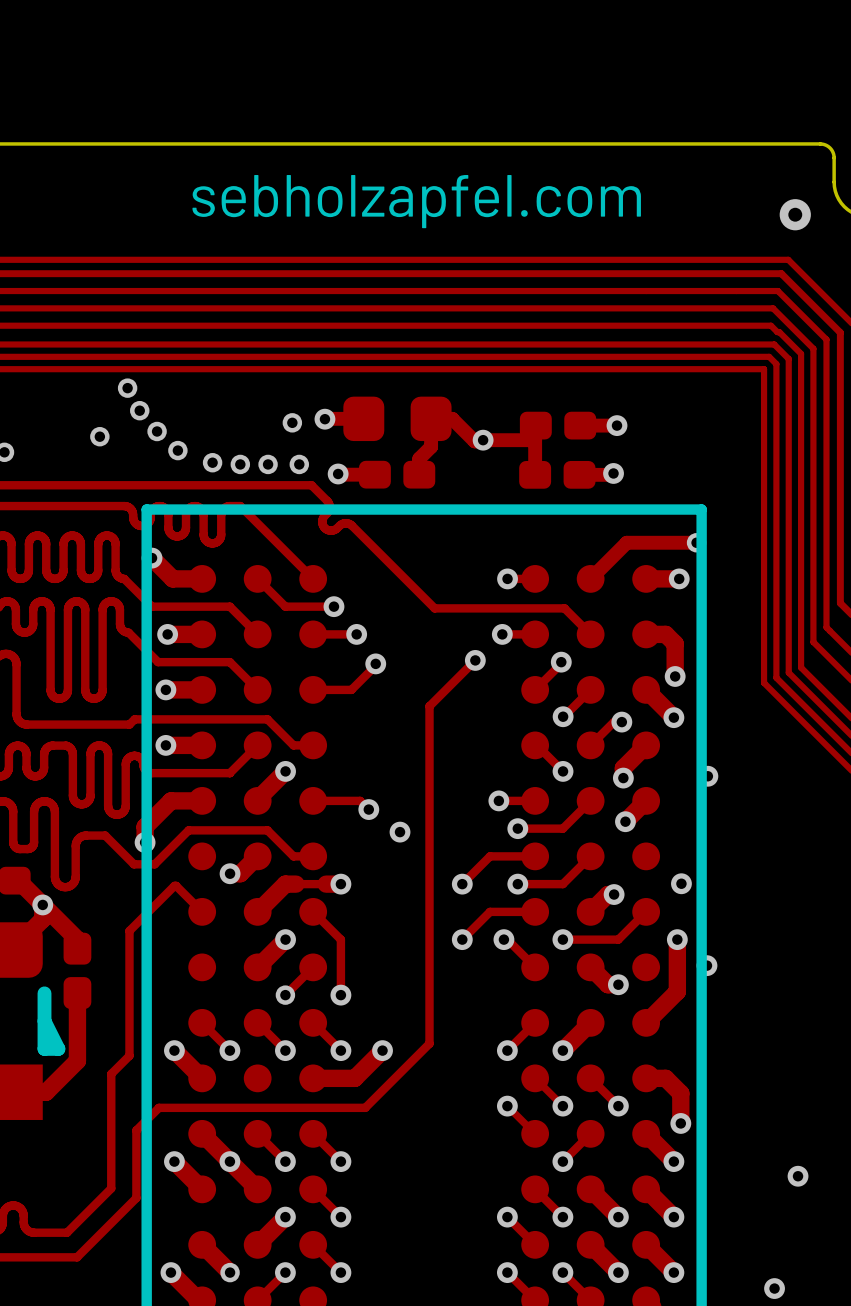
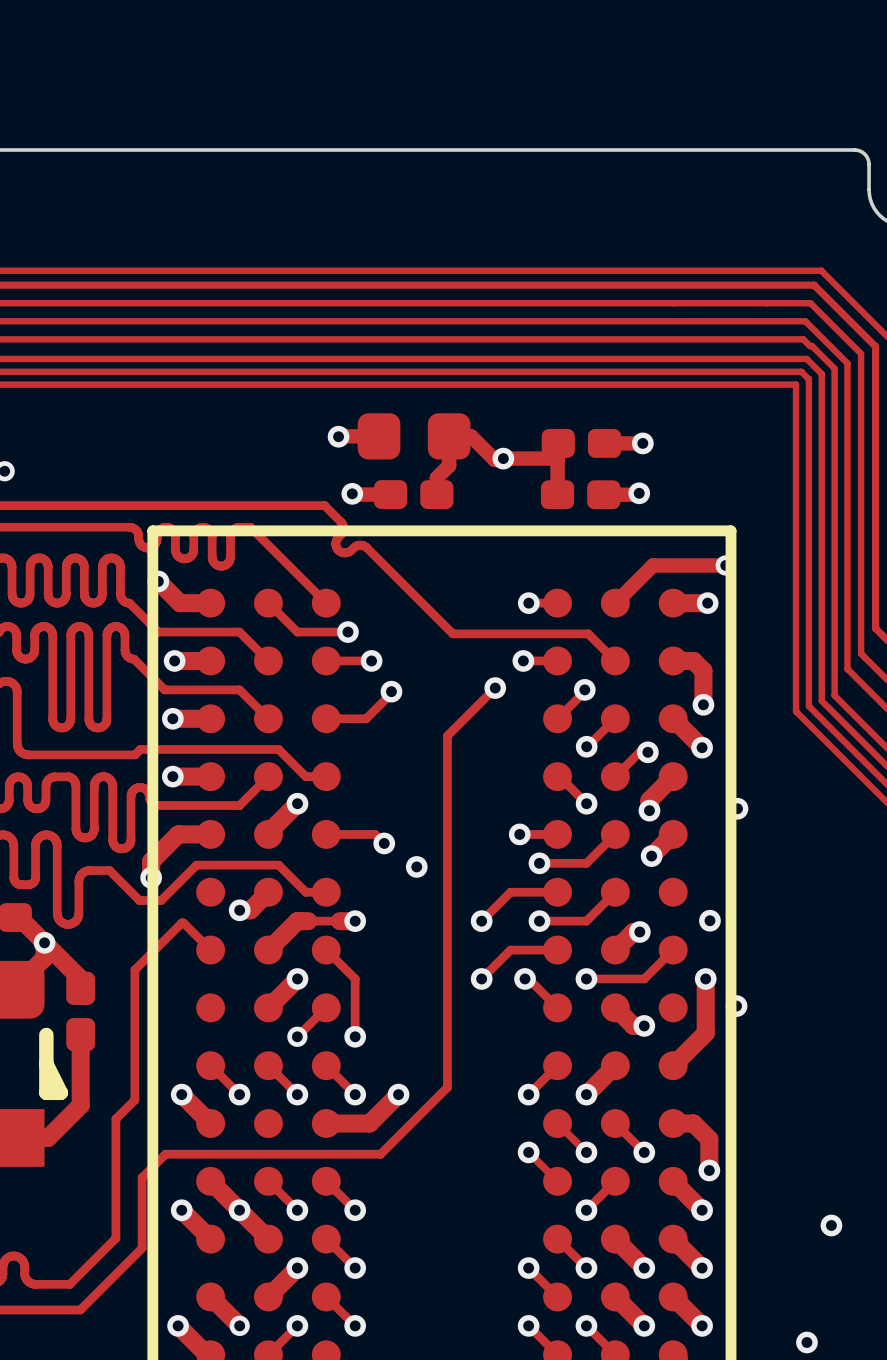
text: sebholzapfel.com (416, 201) -> none
via: (795, 214) -> none
via: (127, 388) -> none
via: (139, 410) -> none
via: (292, 422) -> none
via: (157, 431) -> none
via: (99, 436) -> none
via: (177, 450) -> none
via: (212, 462) -> none
via: (240, 464) -> none
via: (268, 464) -> none
via: (299, 464) -> none

